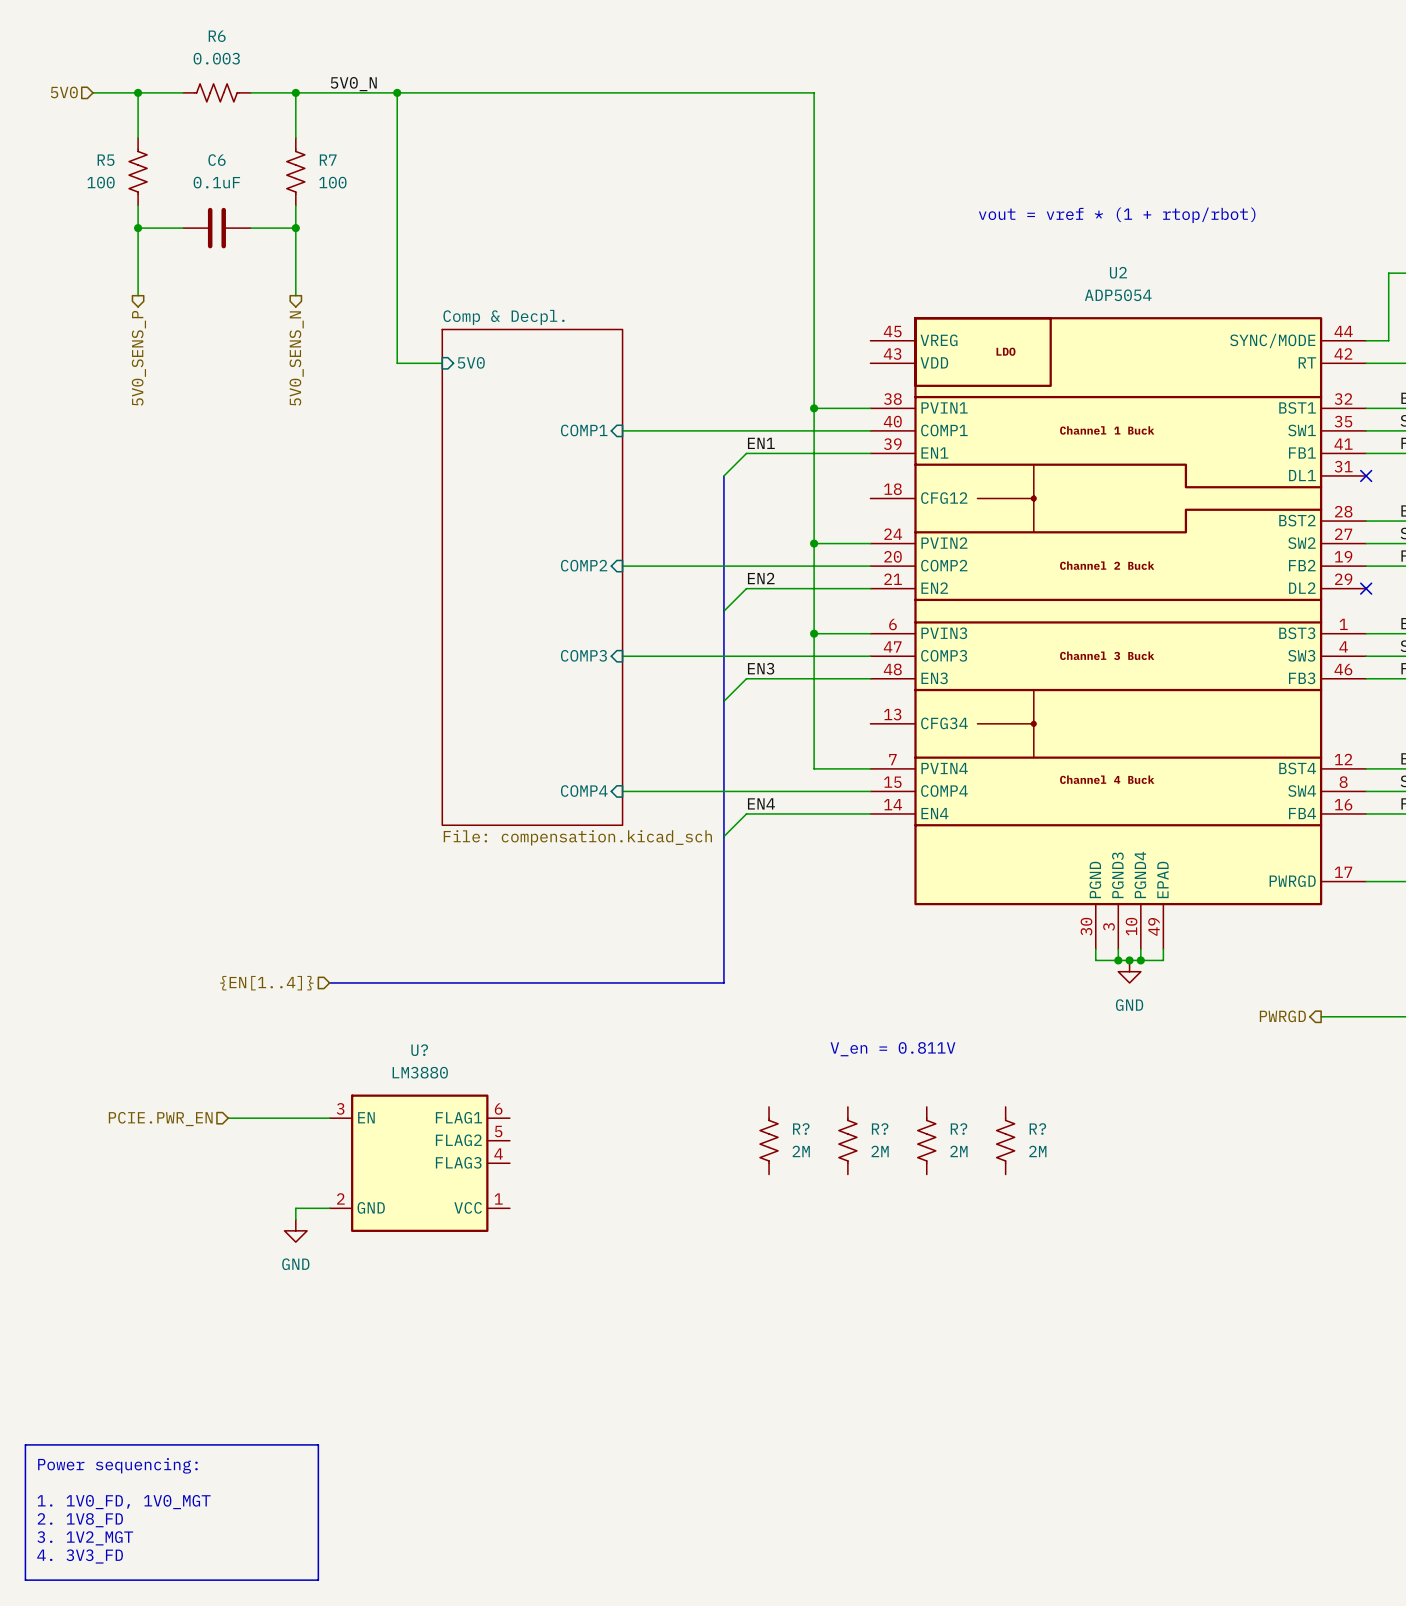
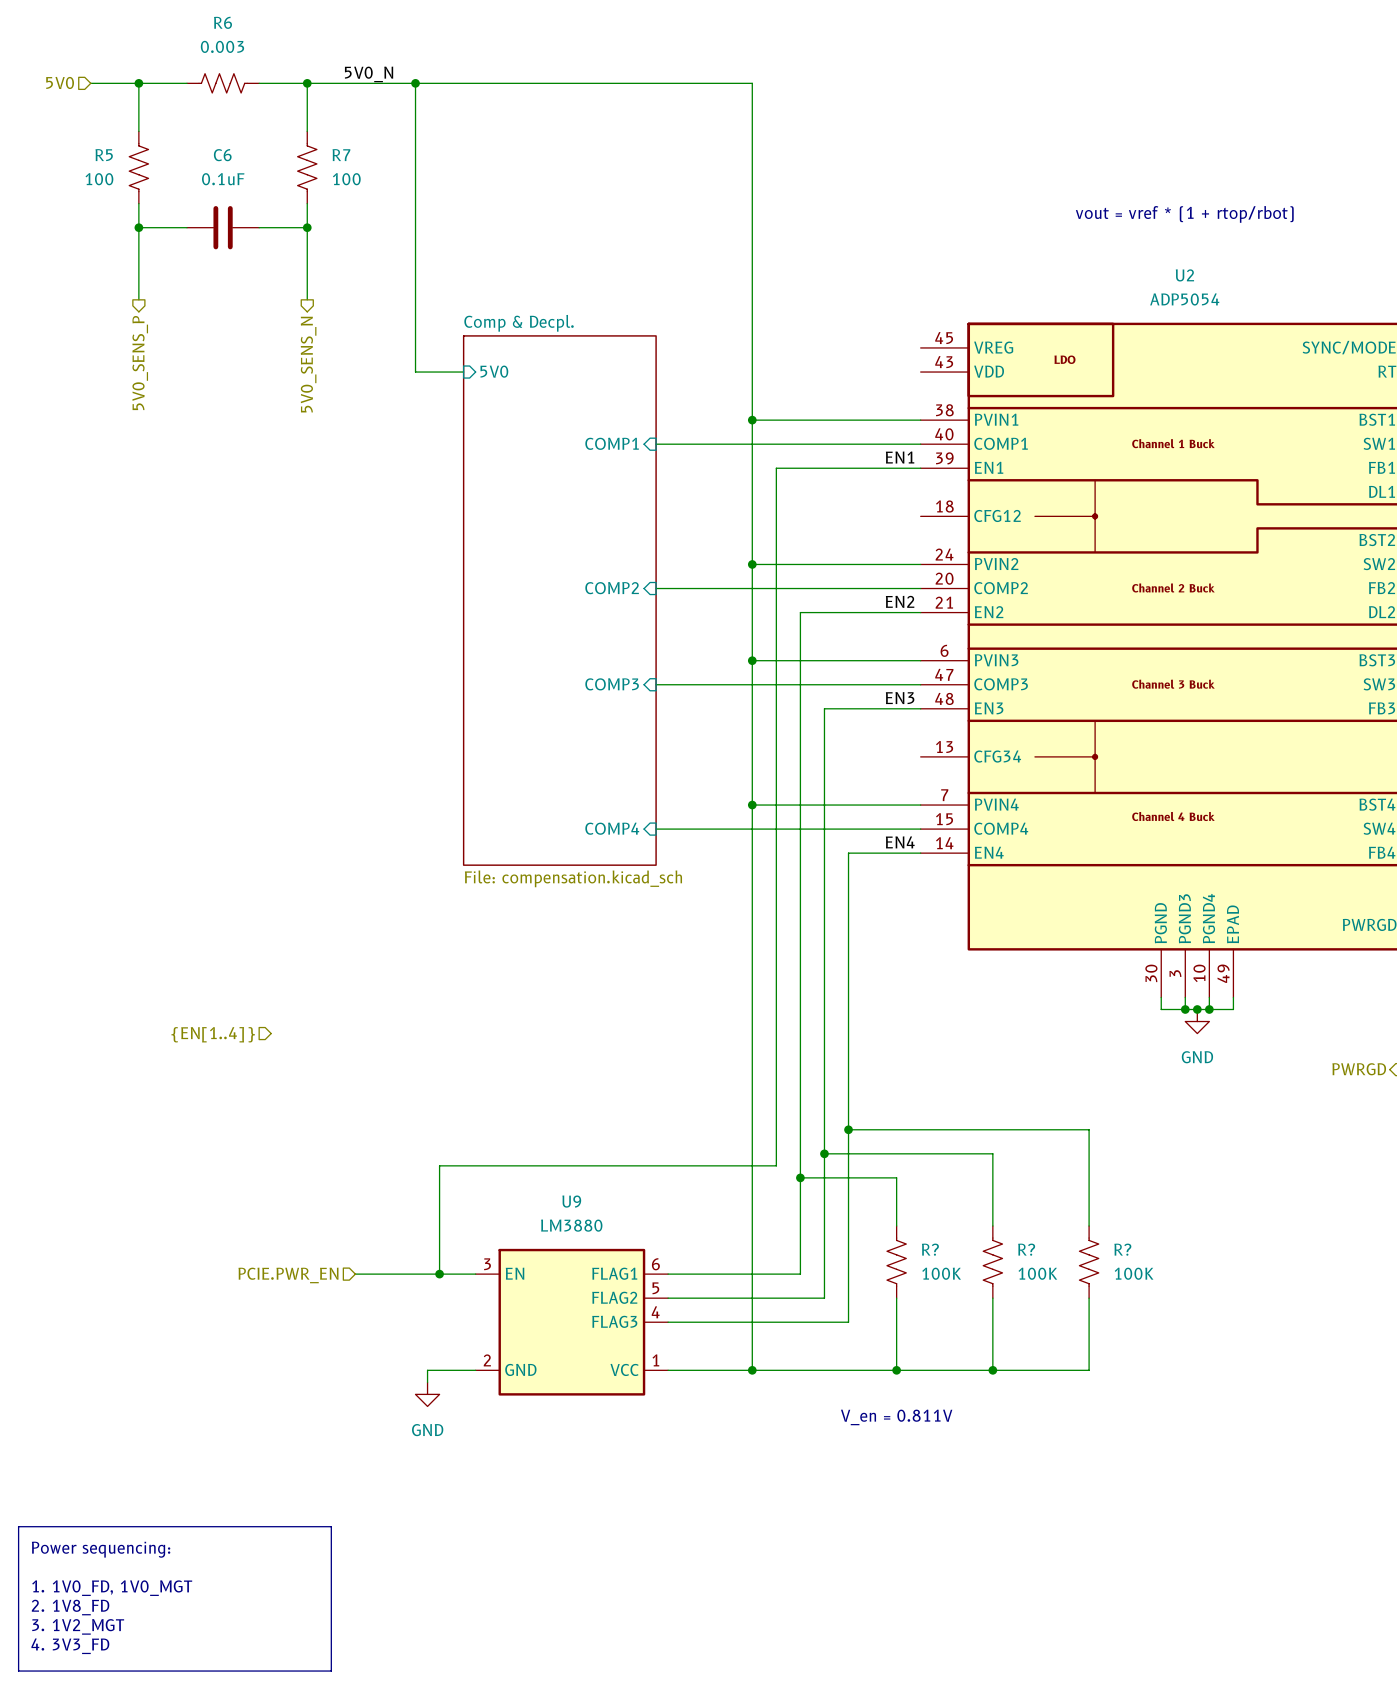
wire: (712, 92) (814, 92) (814, 768) -> (752, 83) (752, 1370)
wire: none -> (752, 420) (860, 420)
junction: none -> (752, 420)
junction: (814, 408) -> none
label position: EN1 (761, 443) -> EN1 (900, 457)
wire: (746, 453) (723, 475) -> (788, 468) (776, 468) (776, 1165) (439, 1165) (439, 1274)
bus: (723, 475) (723, 982) (329, 982) -> none
wire: none -> (752, 564) (860, 564)
junction: none -> (752, 564)
junction: (814, 543) -> none
label position: EN2 (761, 578) -> EN2 (900, 601)
wire: (757, 588) (746, 588) (723, 611) -> (800, 612) (800, 1274) (668, 1274)
wire: none -> (752, 660) (860, 660)
junction: none -> (752, 660)
junction: (814, 633) -> none
label position: EN3 (761, 668) -> EN3 (900, 698)
wire: (780, 678) (746, 678) (723, 701) -> (824, 708) (824, 1298) (668, 1298)
wire: none -> (752, 805) (860, 805)
junction: none -> (752, 805)
label position: EN4 (761, 803) -> EN4 (900, 842)
wire: (802, 813) (746, 813) (723, 836) -> (848, 853) (848, 1322) (668, 1322)
hierarchical label position: {EN[1..4]} (266, 983) -> {EN[1..4]} (213, 1034)
text: V_en = 0.811V (892, 1049) -> none
wire: none -> (848, 1129) (1089, 1129) (1089, 1226)
junction: none -> (848, 1129)
wire: none -> (824, 1153) (992, 1153) (992, 1226)
junction: none -> (824, 1153)
wire: (228, 1118) (329, 1118) -> none
wire: none -> (800, 1177) (896, 1177) (896, 1226)
junction: none -> (800, 1177)
hierarchical label position: PCIE.PWR_EN (160, 1119) -> PCIE.PWR_EN (288, 1275)
R?: 2M (769, 1140) -> none
R?: 2M (847, 1140) -> none
R?: 2M (926, 1140) -> none
R?: 2M (1005, 1140) -> none
U?: LM3880 (419, 1163) -> none
R?: none -> 100K (896, 1262)
R?: none -> 100K (992, 1262)
R?: none -> 100K (1089, 1262)
wire: (329, 1208) (295, 1208) (295, 1219) -> none
junction: none -> (439, 1274)
power symbol position: GND (295, 1230) -> GND (427, 1394)
wire: none -> (896, 1298) (896, 1370)
wire: none -> (992, 1298) (992, 1370)
wire: none -> (1089, 1298) (1089, 1370) (668, 1370)
U9: none -> LM3880 (571, 1322)
wire: none -> (475, 1370) (427, 1370) (427, 1382)
junction: none -> (752, 1370)
junction: none -> (896, 1370)
junction: none -> (992, 1370)
text: none -> V_en = 0.811V (896, 1417)

